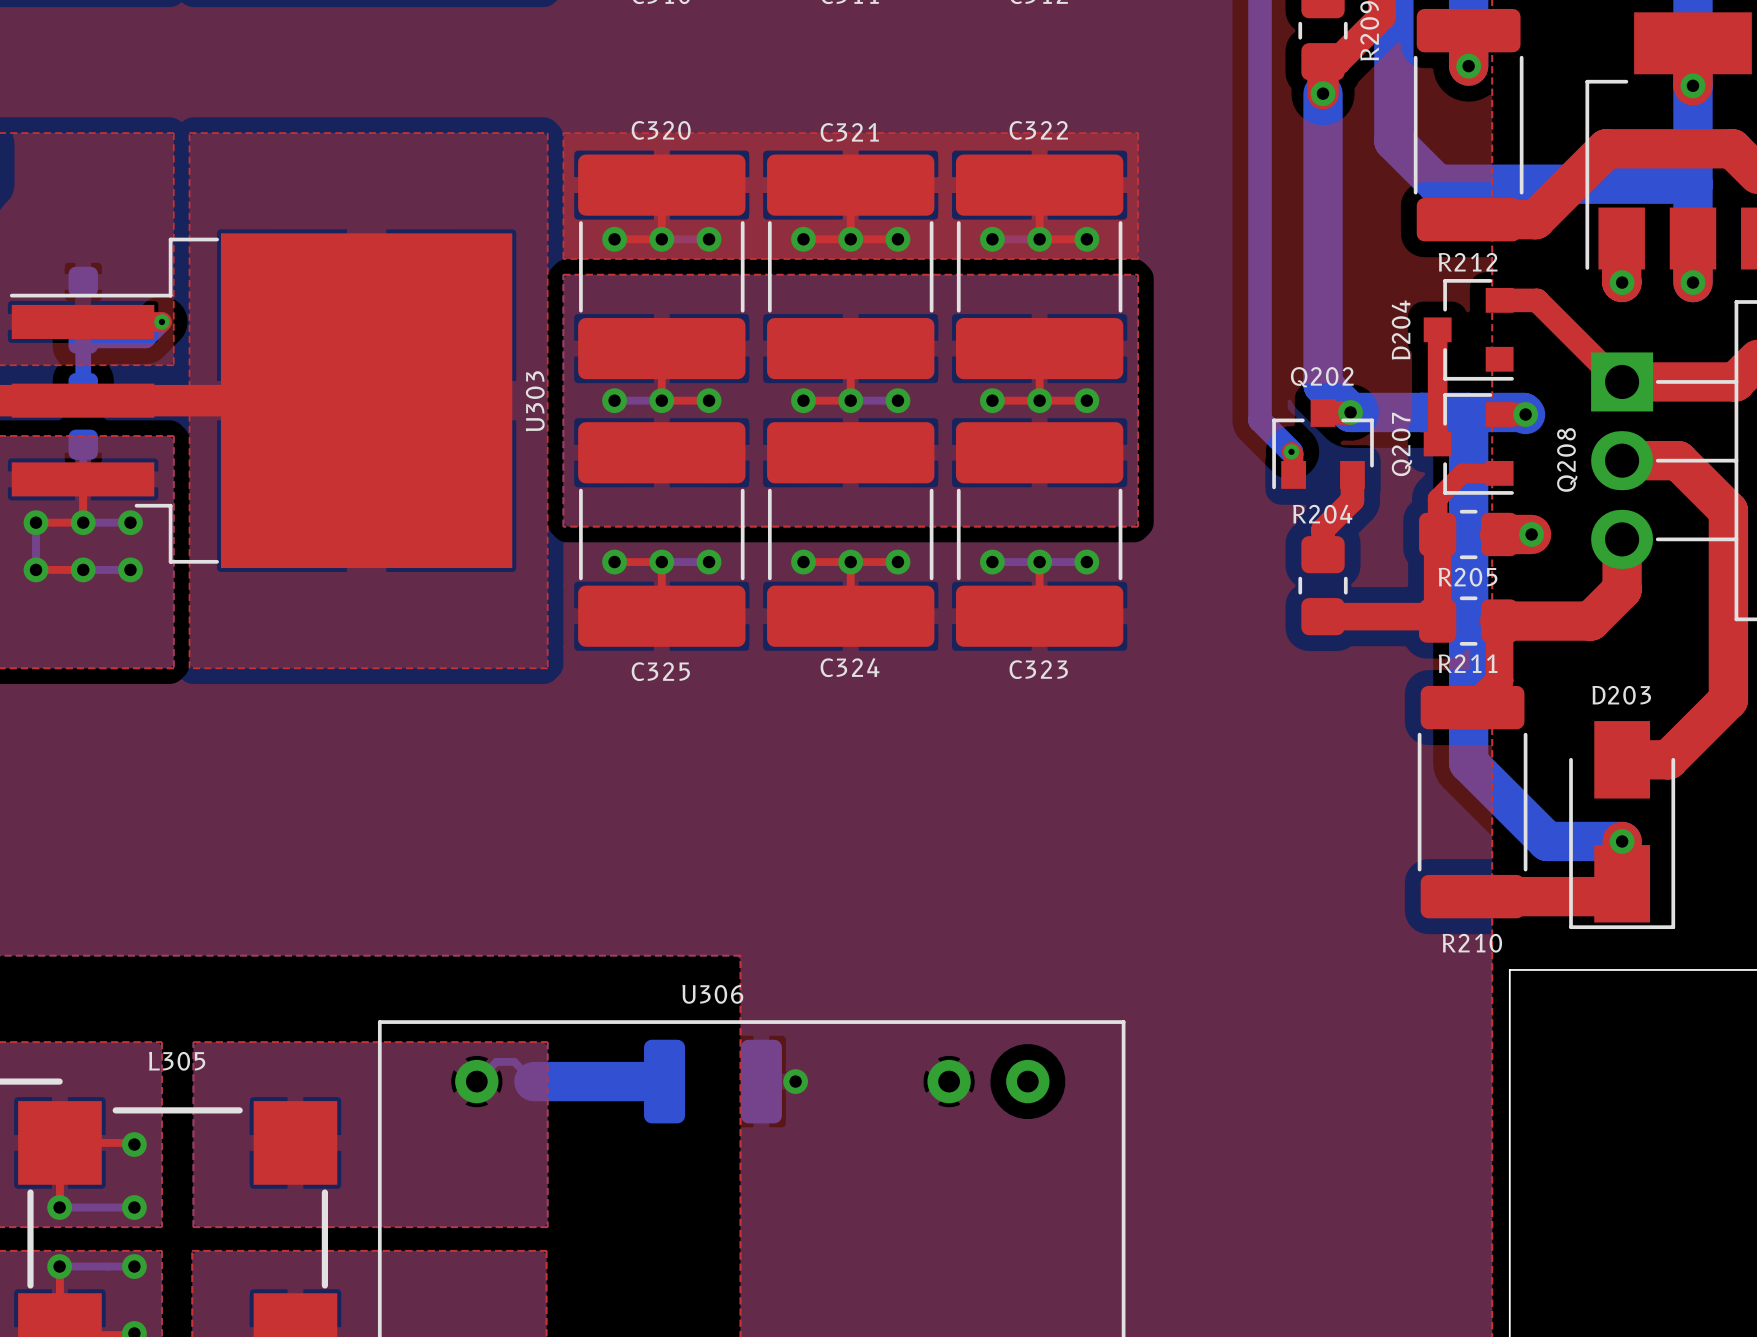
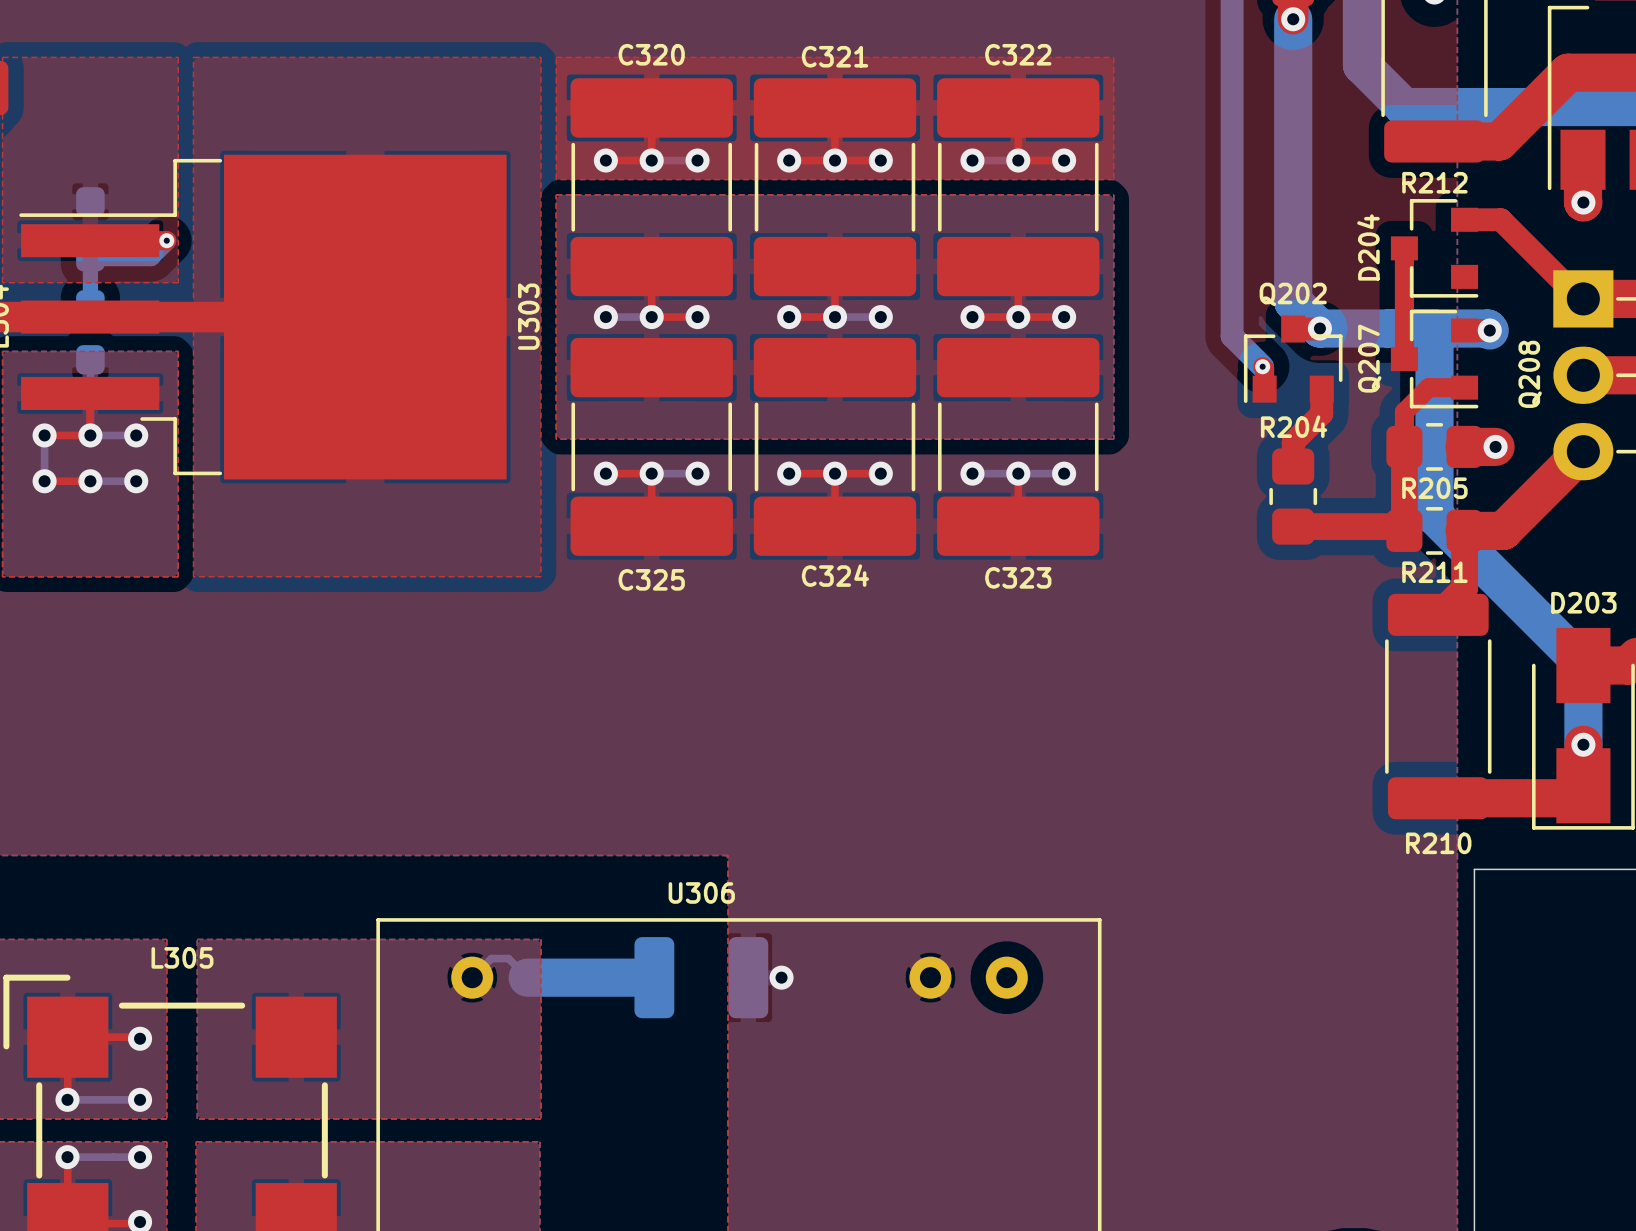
top track: (1622, 539) (1622, 589) (1590, 621) (1539, 621) -> (1583, 451) (1503, 530)
bottom track: (1468, 605) (1468, 762) (1547, 841) (1622, 841) -> (1434, 515) (1583, 664) (1583, 744)

